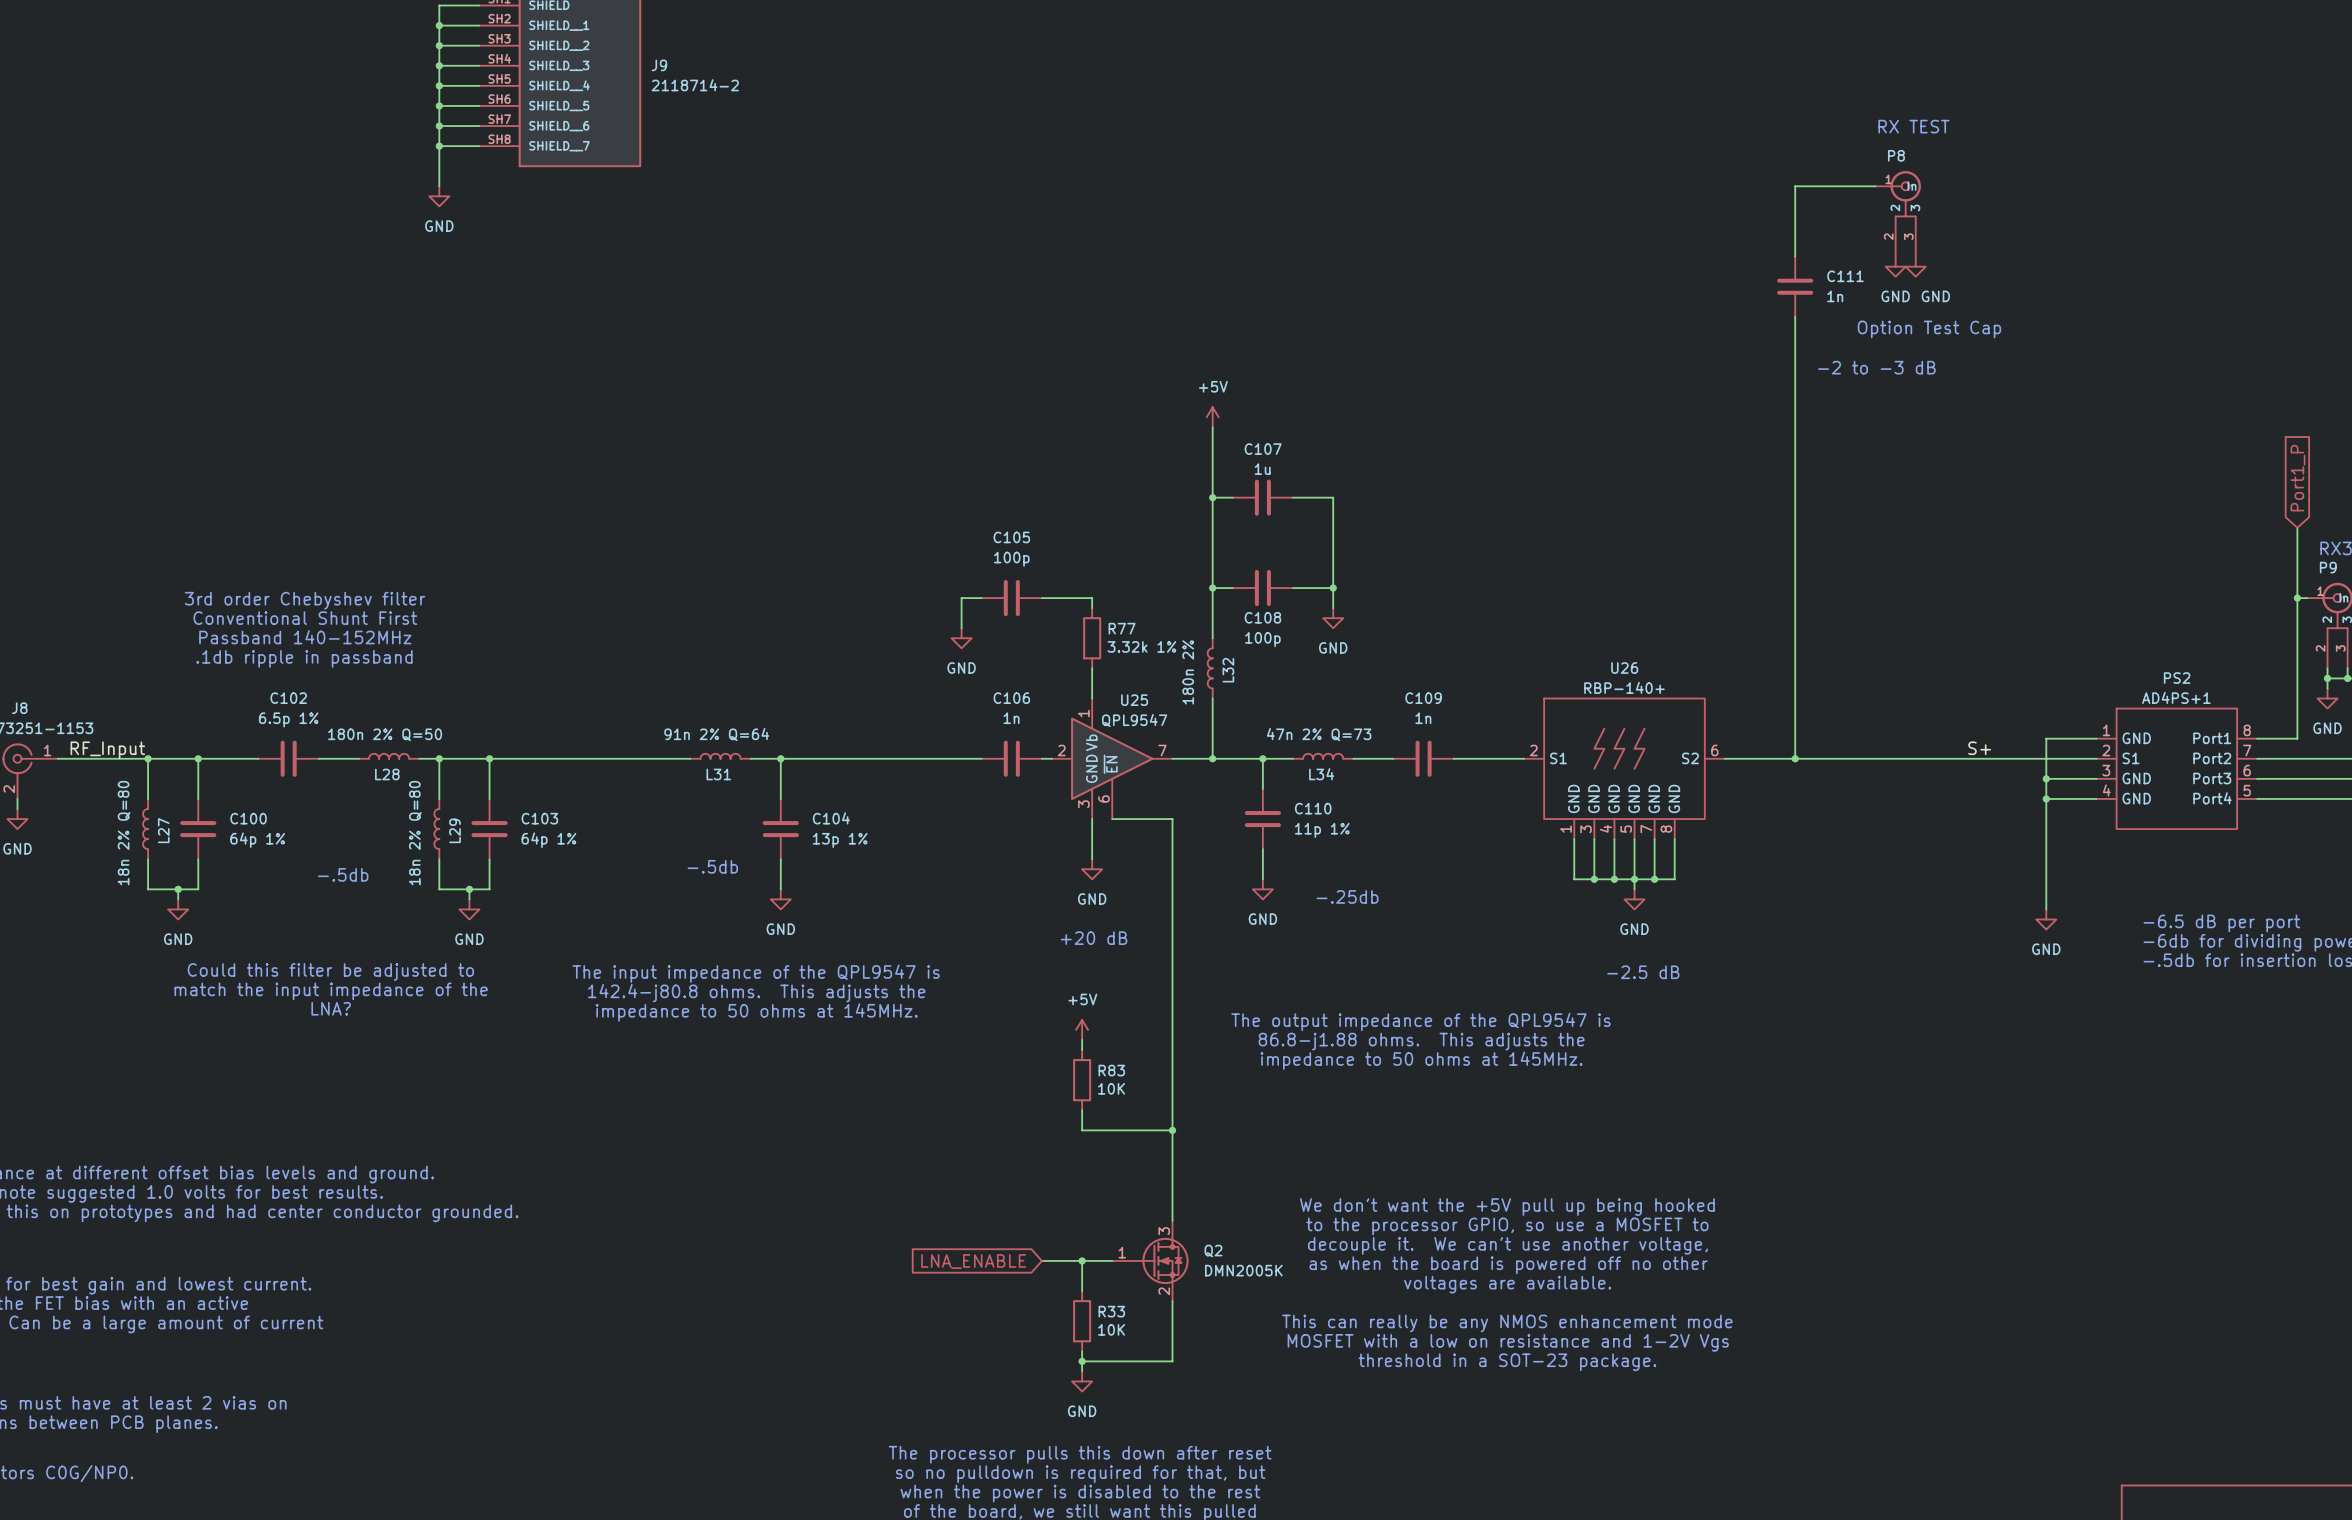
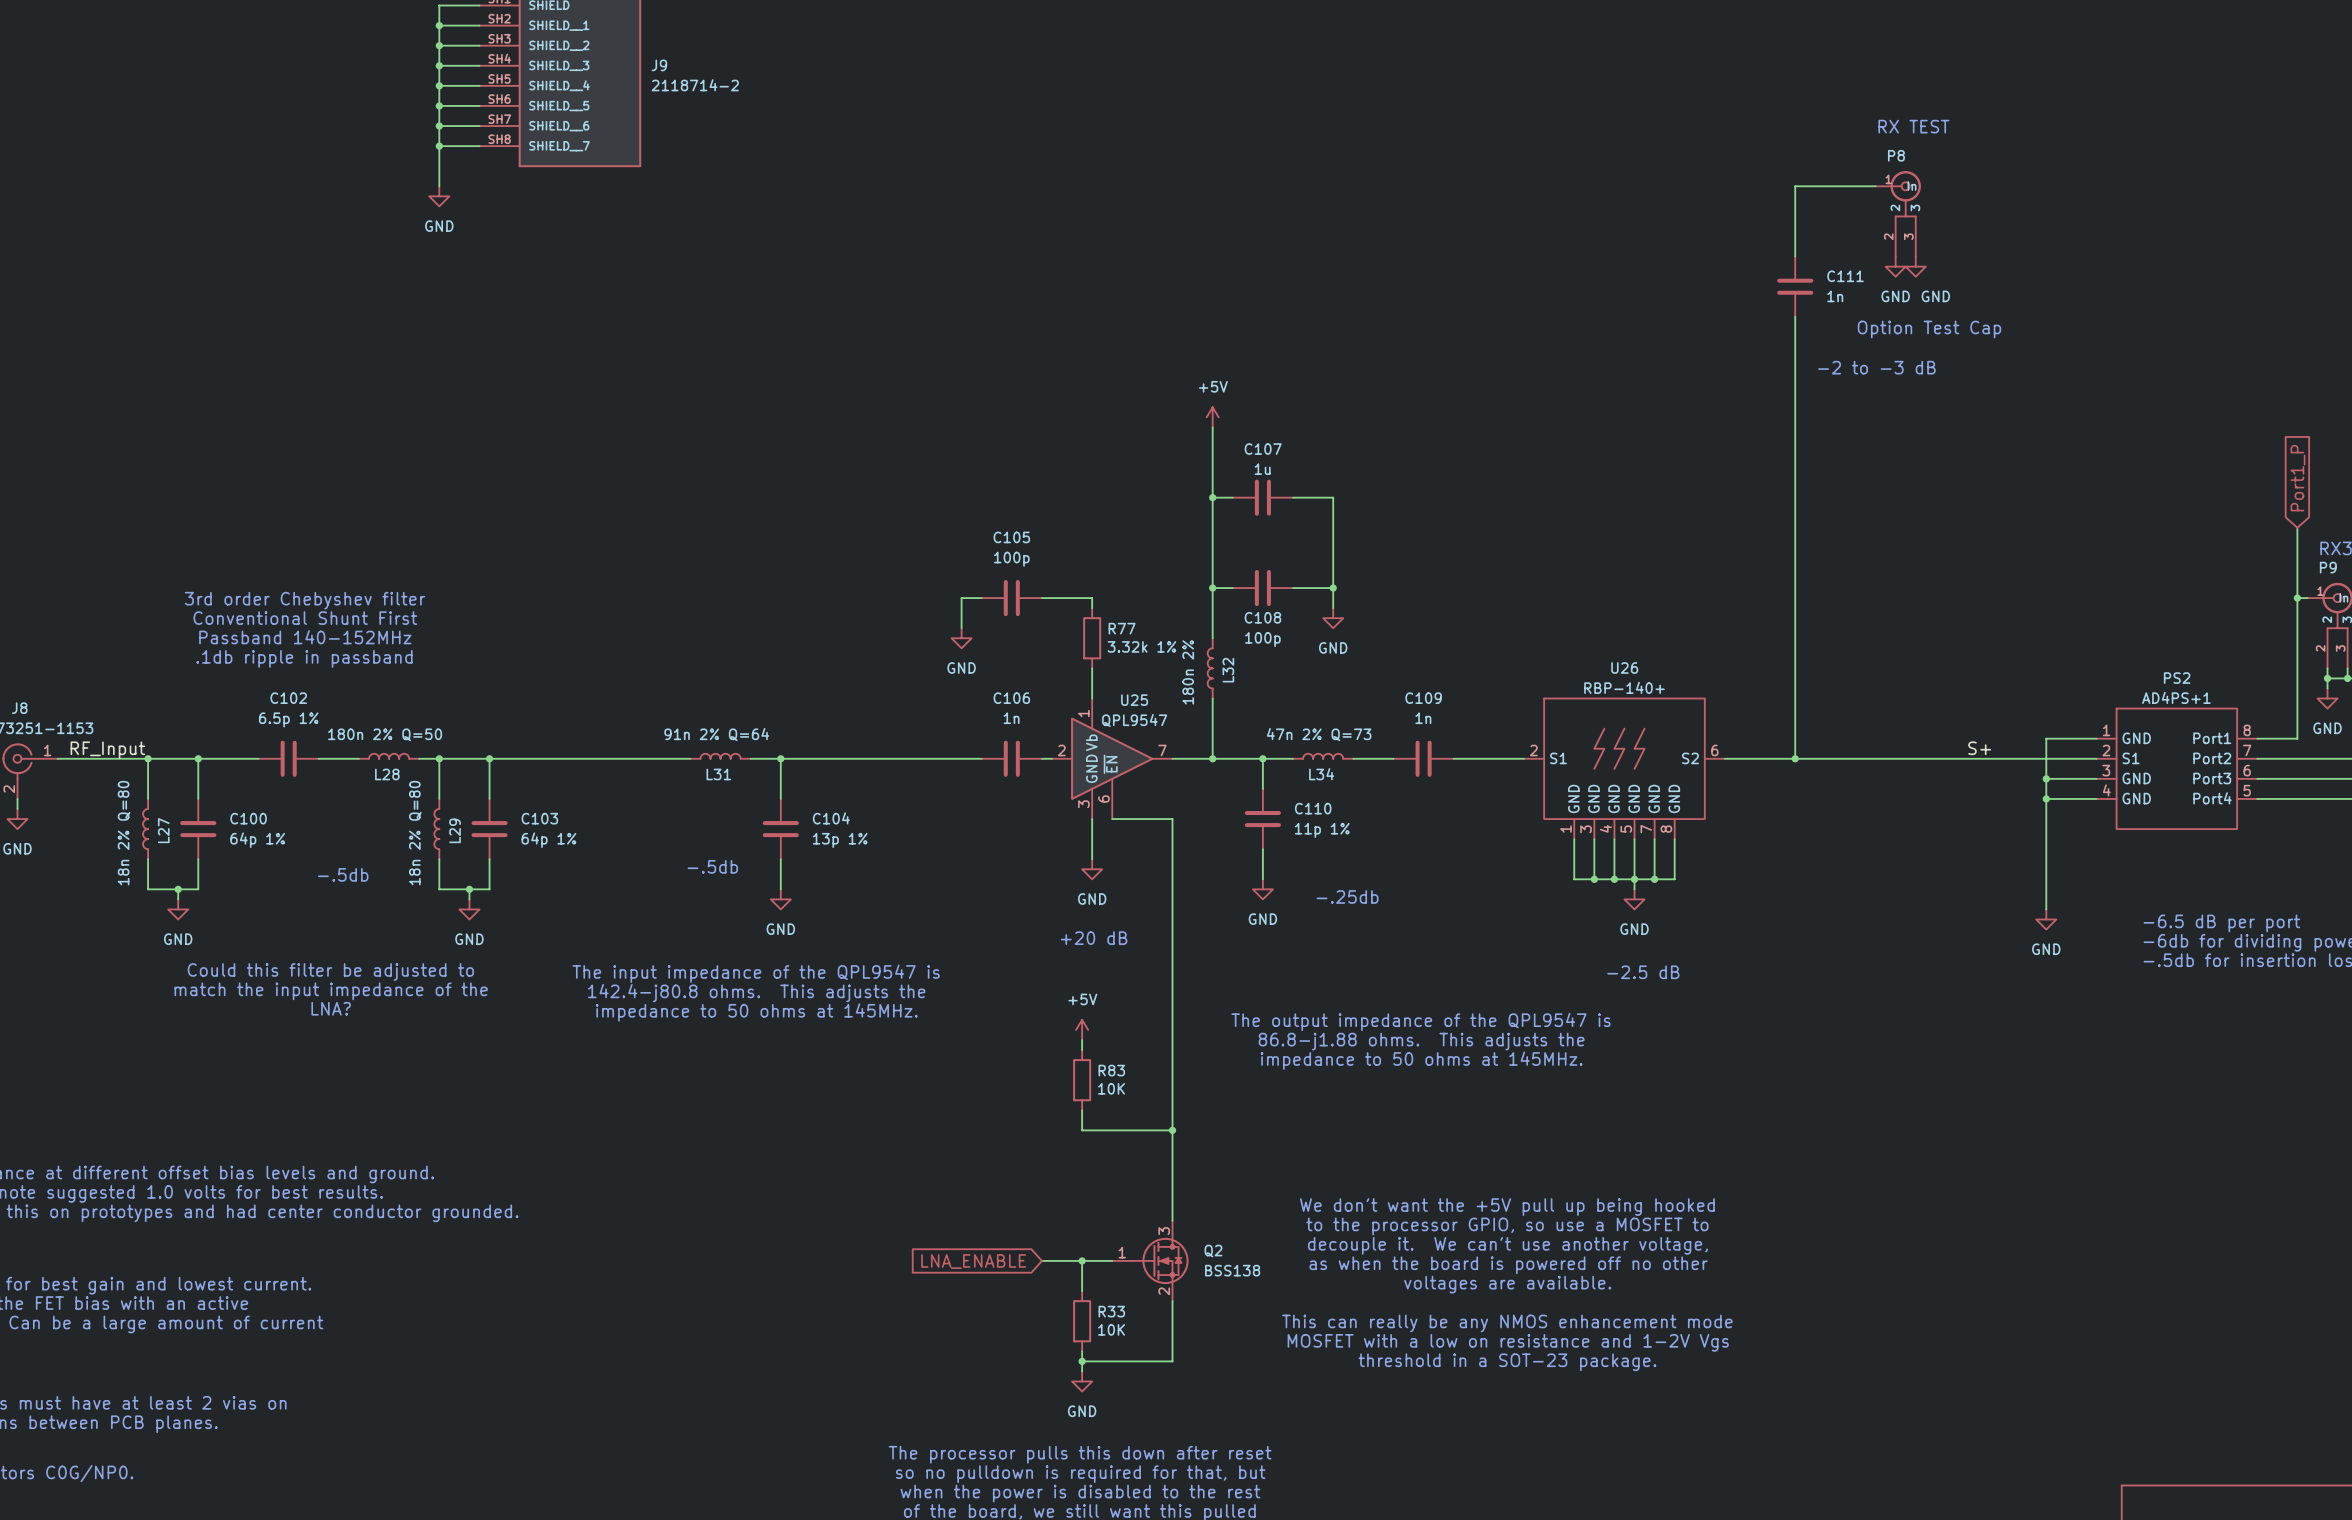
Q2 value: DMN2005K (1243, 1270) -> BSS138 (1232, 1270)

